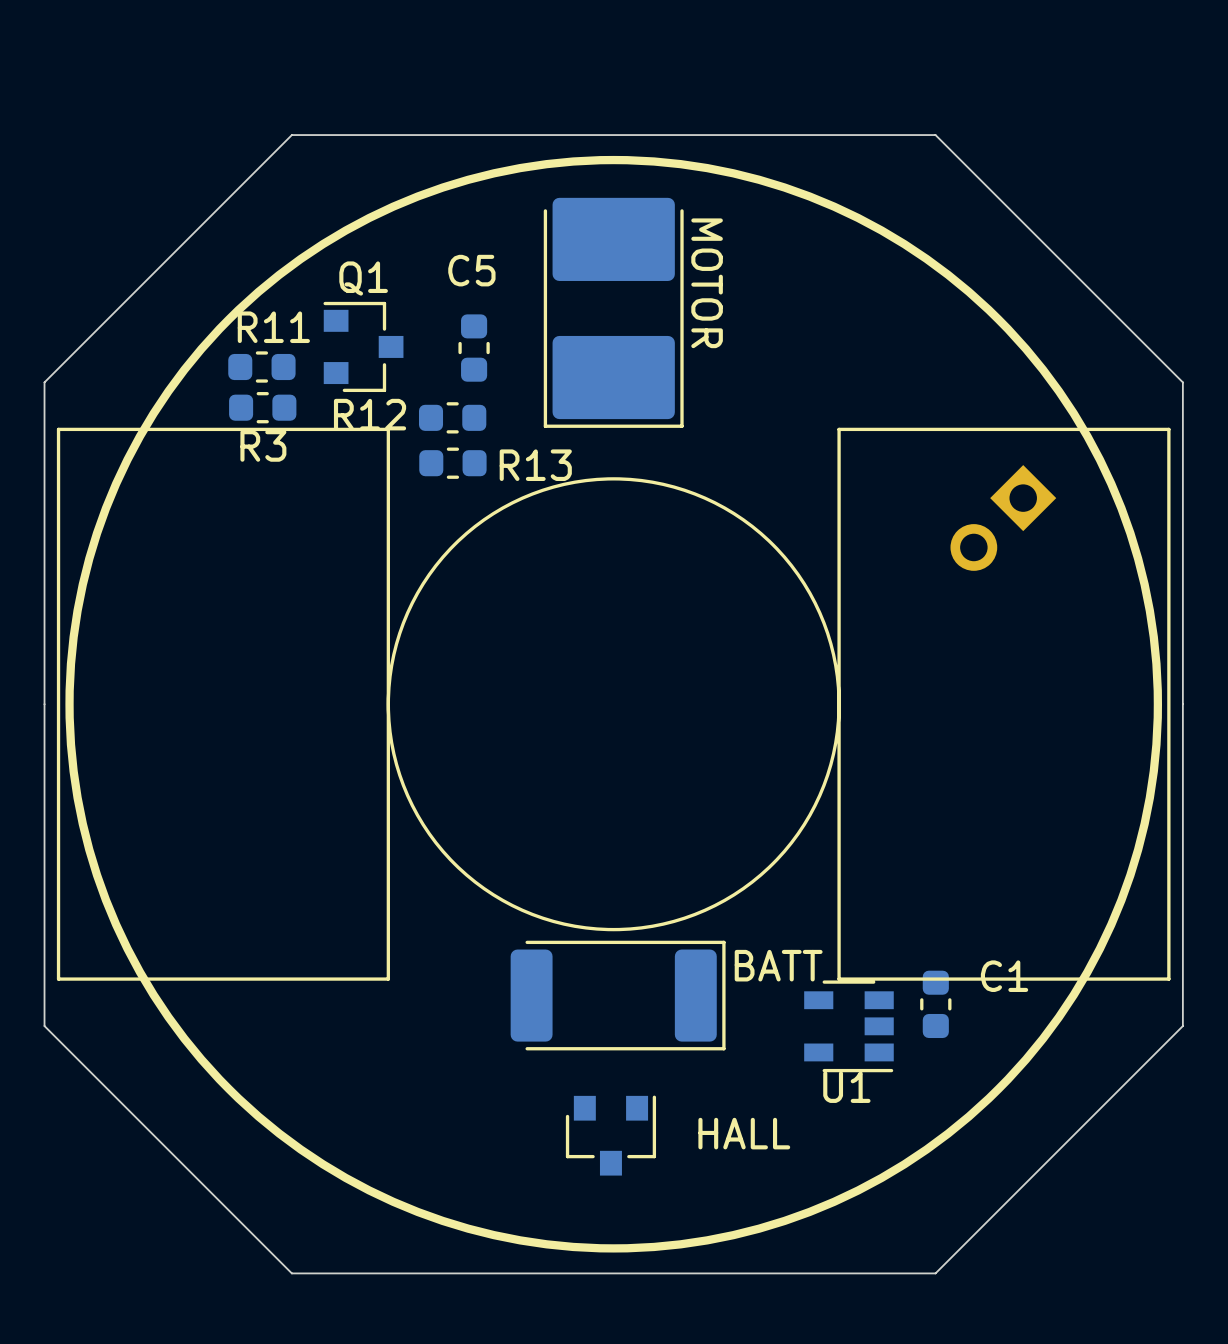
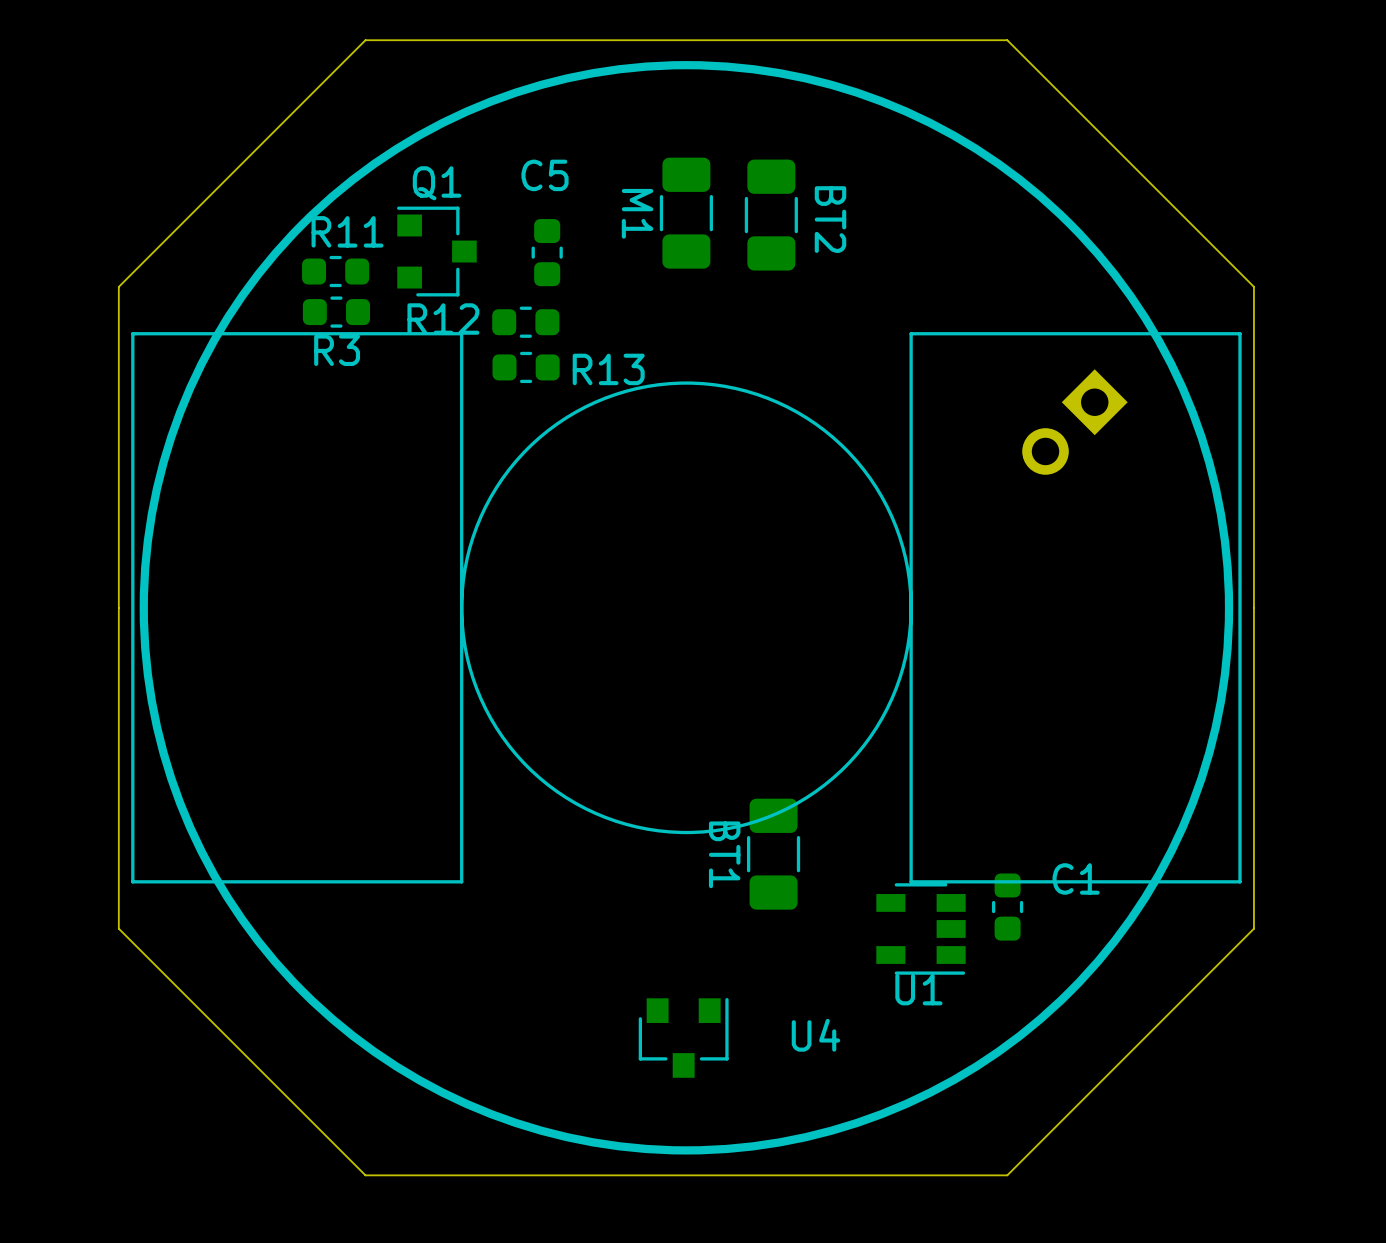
M1: none -> (686, 213)
BT2: none -> (771, 215)
MOTOR: (613, 312) -> none
BT1: none -> (773, 854)
BATT: (618, 995) -> none
HALL name: HALL (744, 1133) -> U4 (815, 1035)

